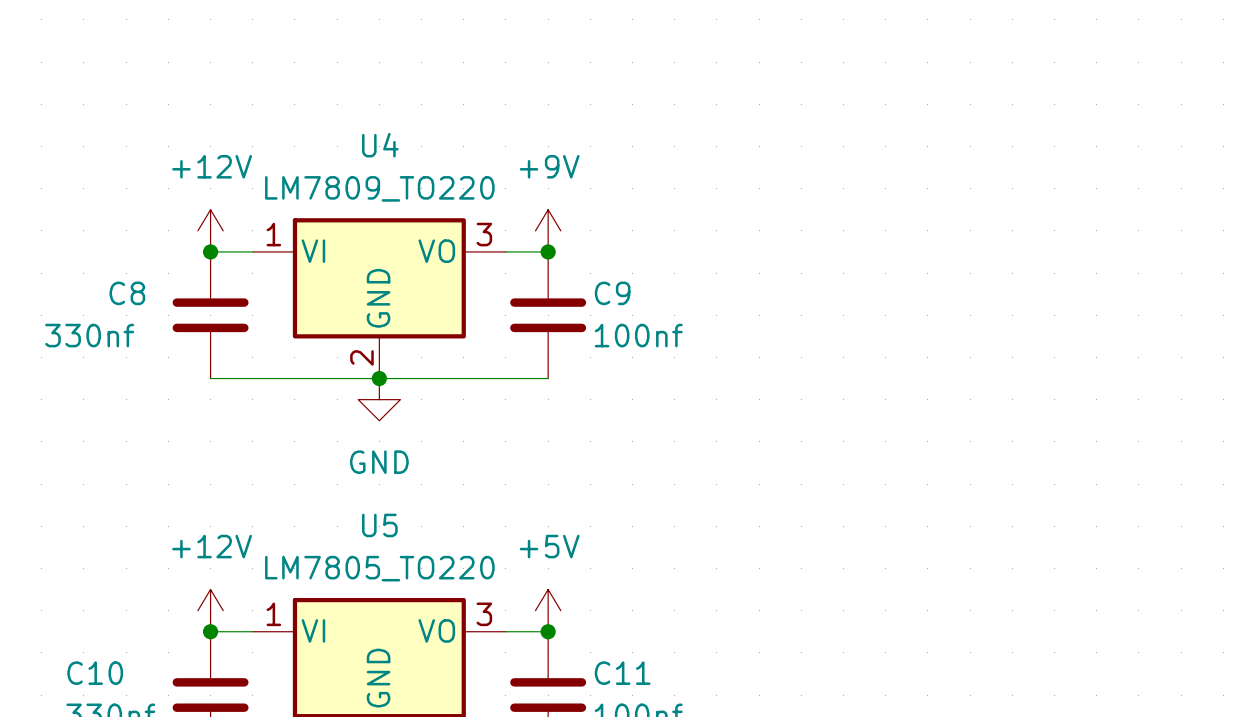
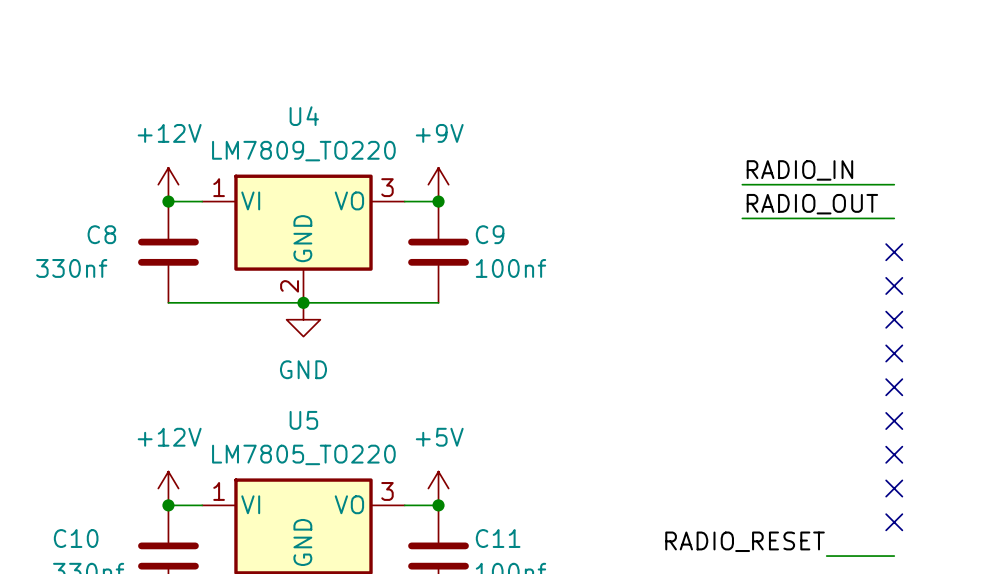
label: none -> RADIO_IN (799, 170)
wire: none -> (742, 184) (894, 184)
label: none -> RADIO_OUT (812, 204)
wire: none -> (742, 218) (894, 218)
no-connect mark: none -> (894, 252)
no-connect mark: none -> (894, 285)
no-connect mark: none -> (894, 319)
no-connect mark: none -> (894, 353)
no-connect mark: none -> (894, 387)
no-connect mark: none -> (894, 420)
no-connect mark: none -> (894, 454)
no-connect mark: none -> (894, 488)
no-connect mark: none -> (894, 522)
label: none -> RADIO_RESET (745, 541)
wire: none -> (826, 556) (894, 556)

